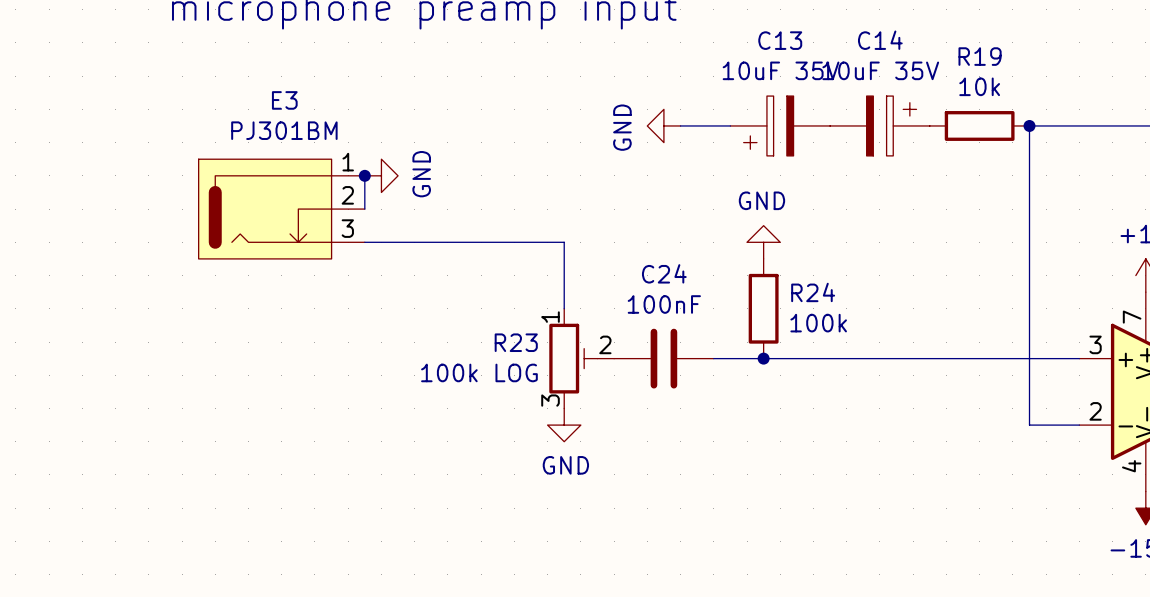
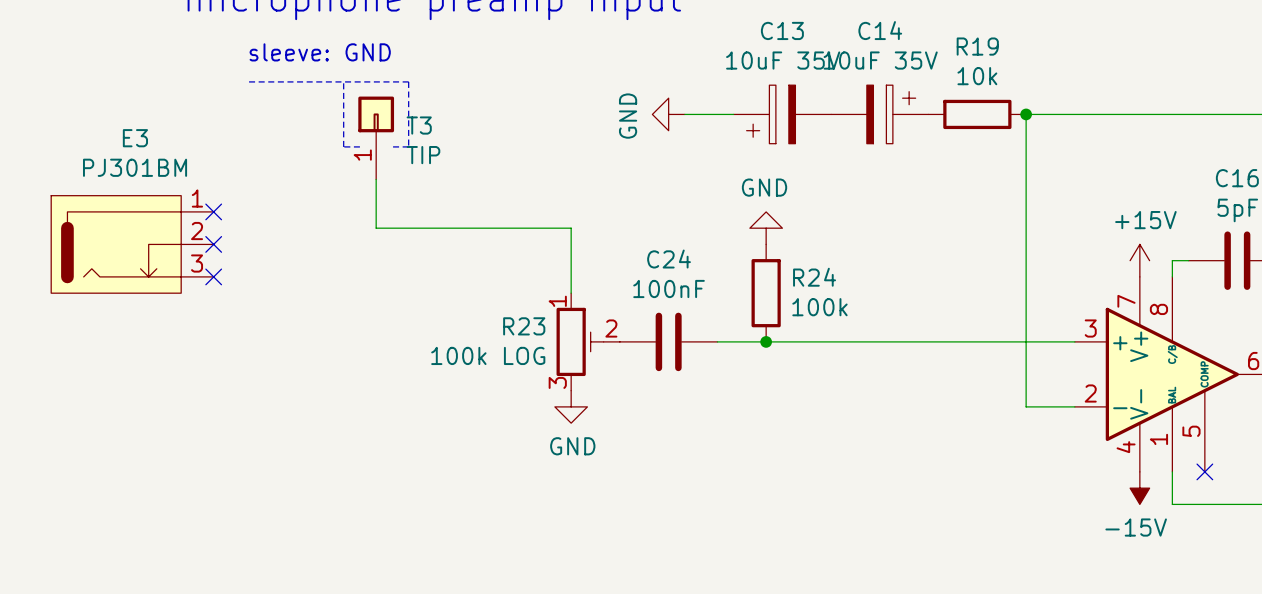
text: none -> sleeve: GND (320, 52)
line: none -> (246, 81) (408, 81) (408, 146) (392, 146)
line: none -> (343, 81) (343, 146) (359, 146)
T3: none -> TIP (376, 137)
junction: (364, 175) -> none
power symbol: GND (381, 175) -> none
E3 position: (281, 209) -> (132, 244)
wire: none -> (376, 195) (376, 228)
no-connect mark: none -> (213, 211)
no-connect mark: none -> (213, 244)
no-connect mark: none -> (213, 276)

